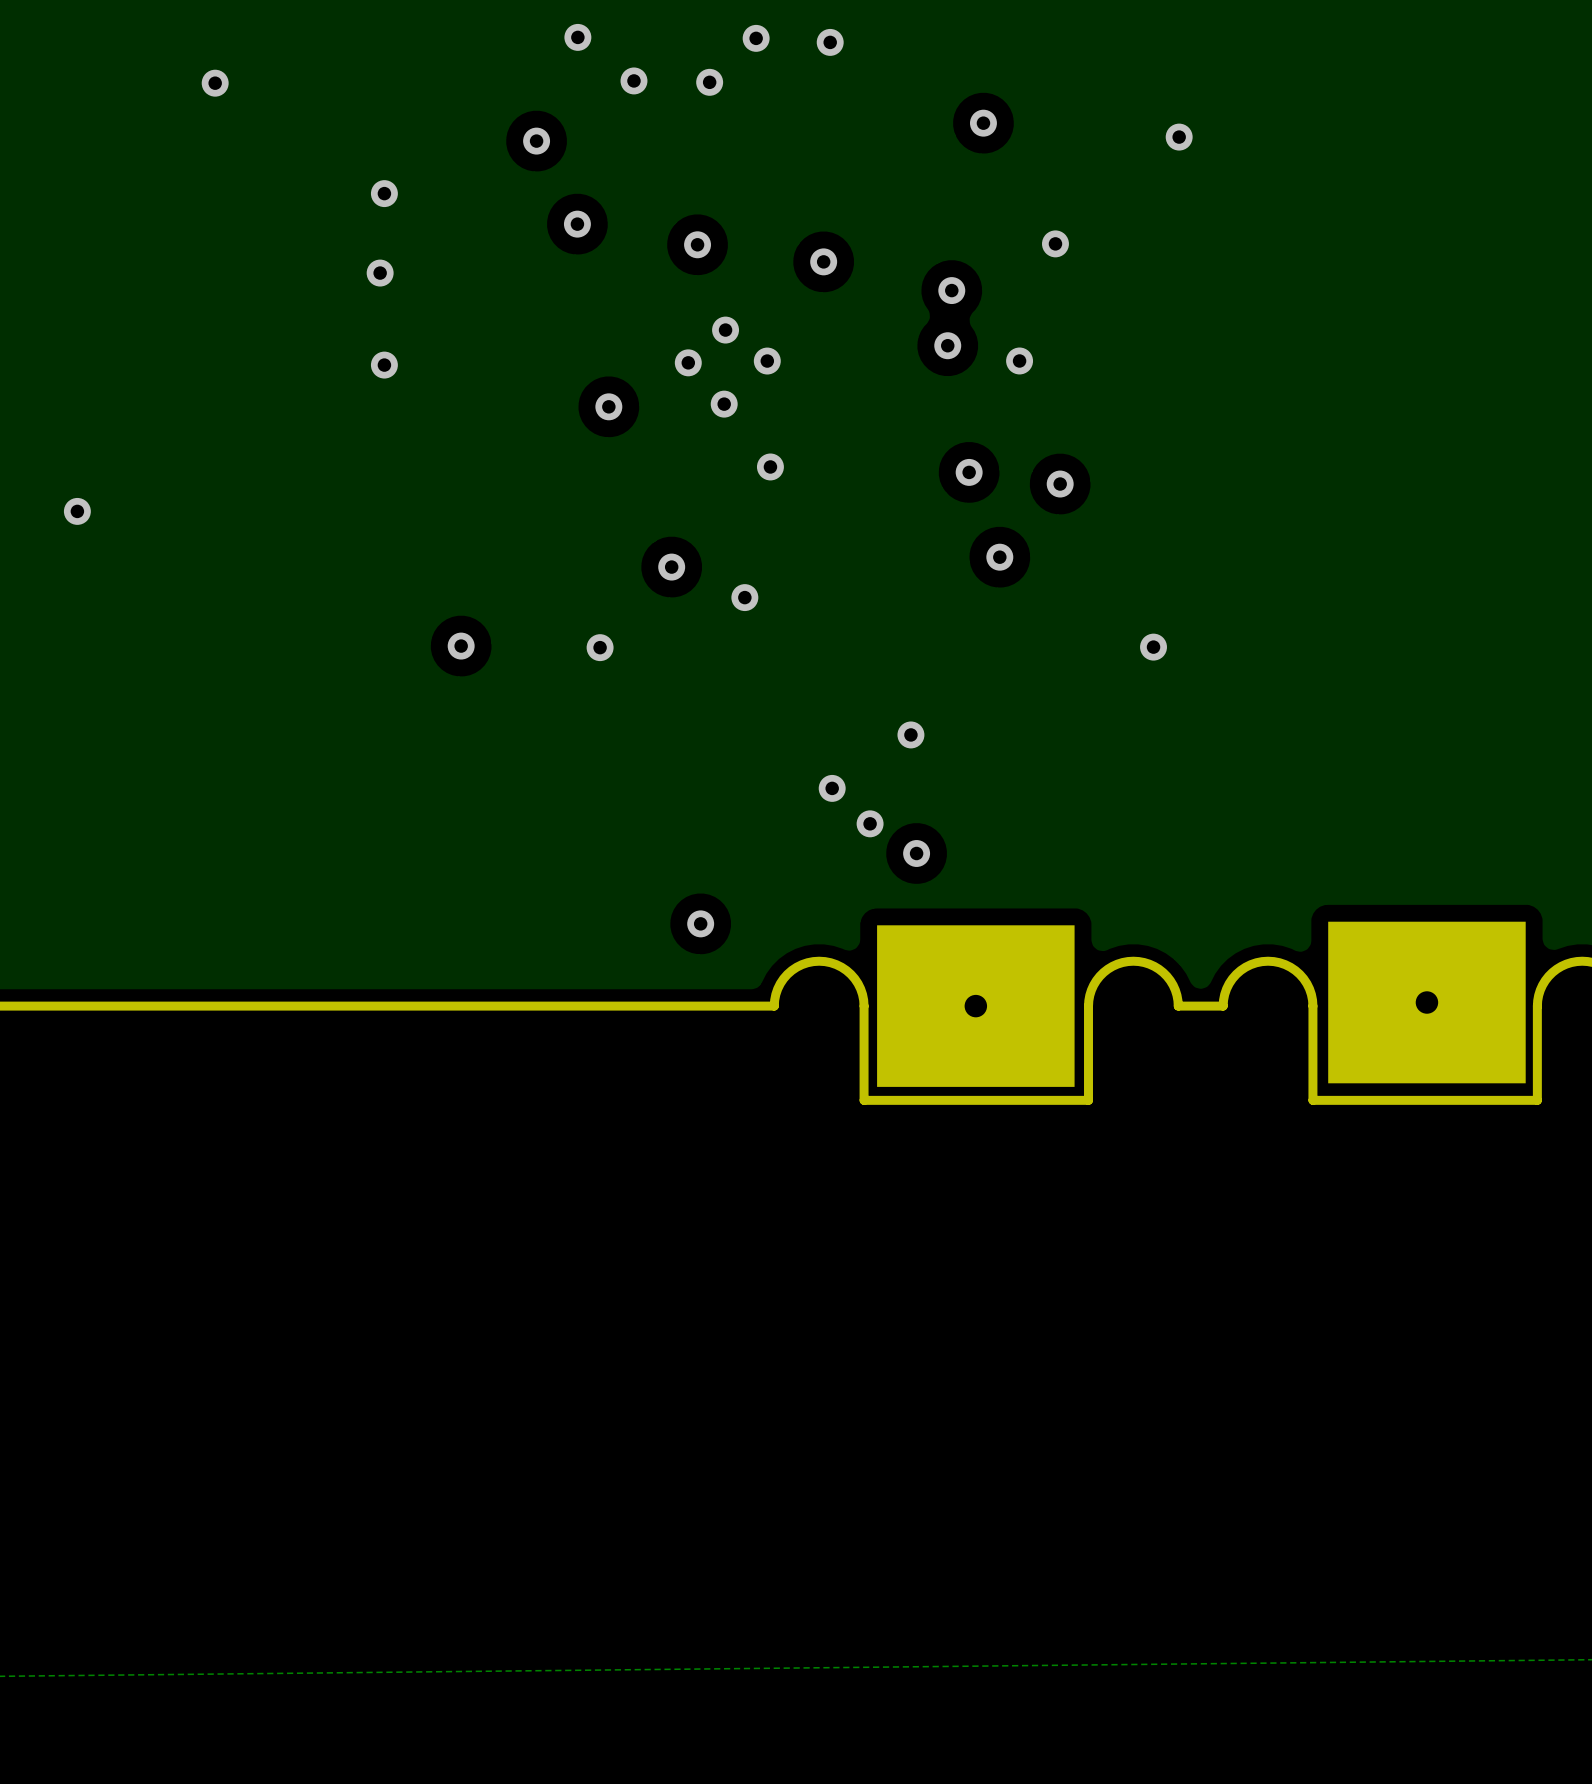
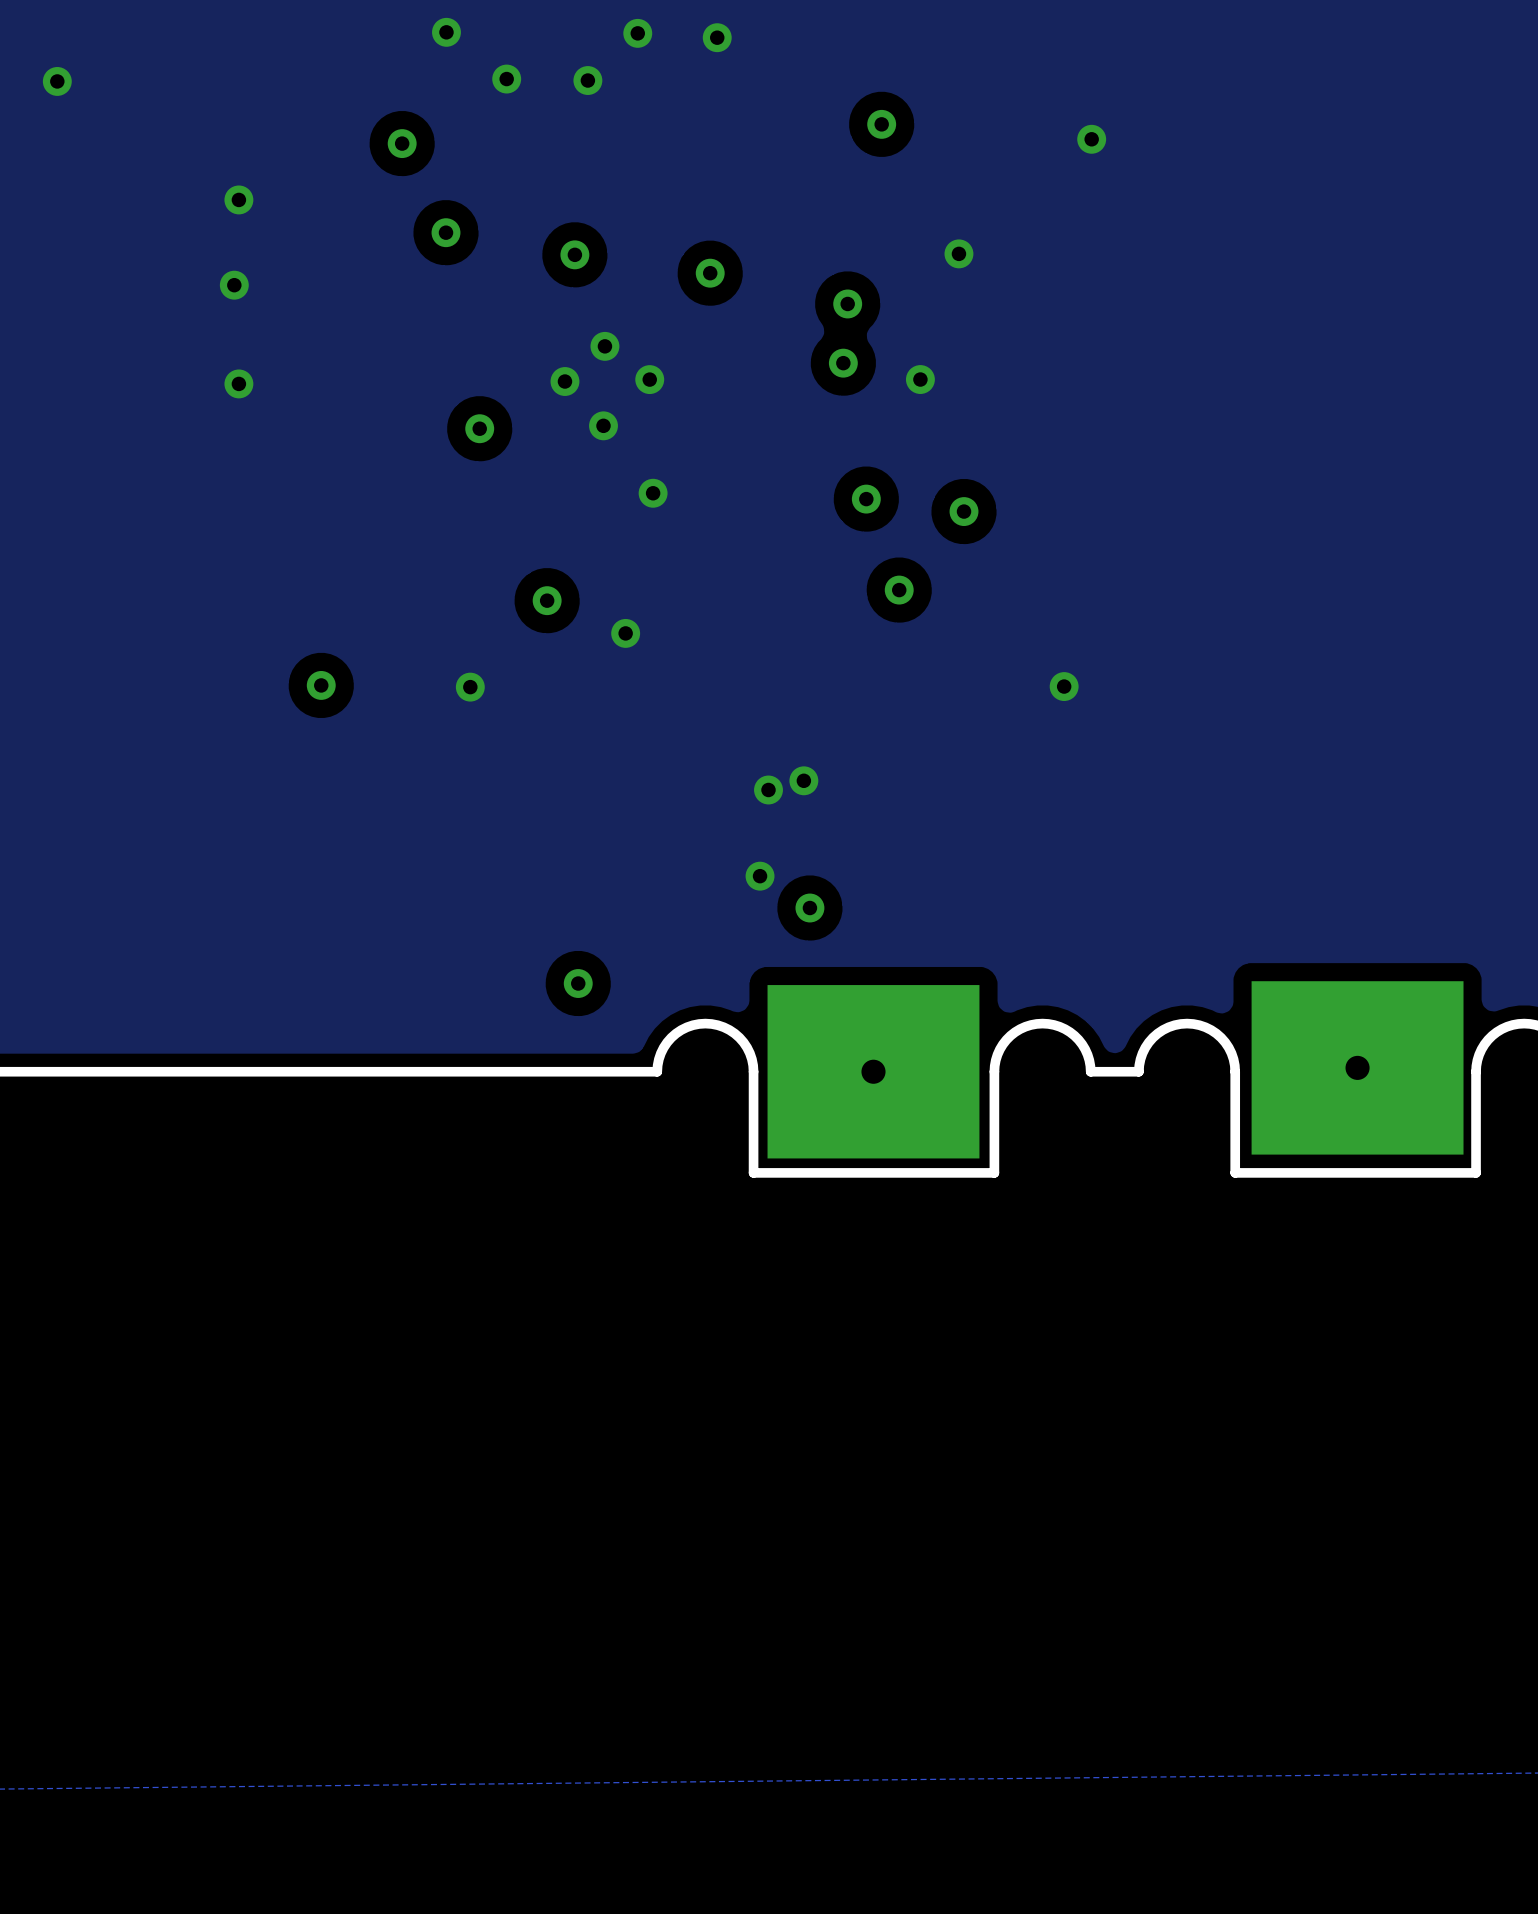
via position: (832, 788) -> (768, 789)

